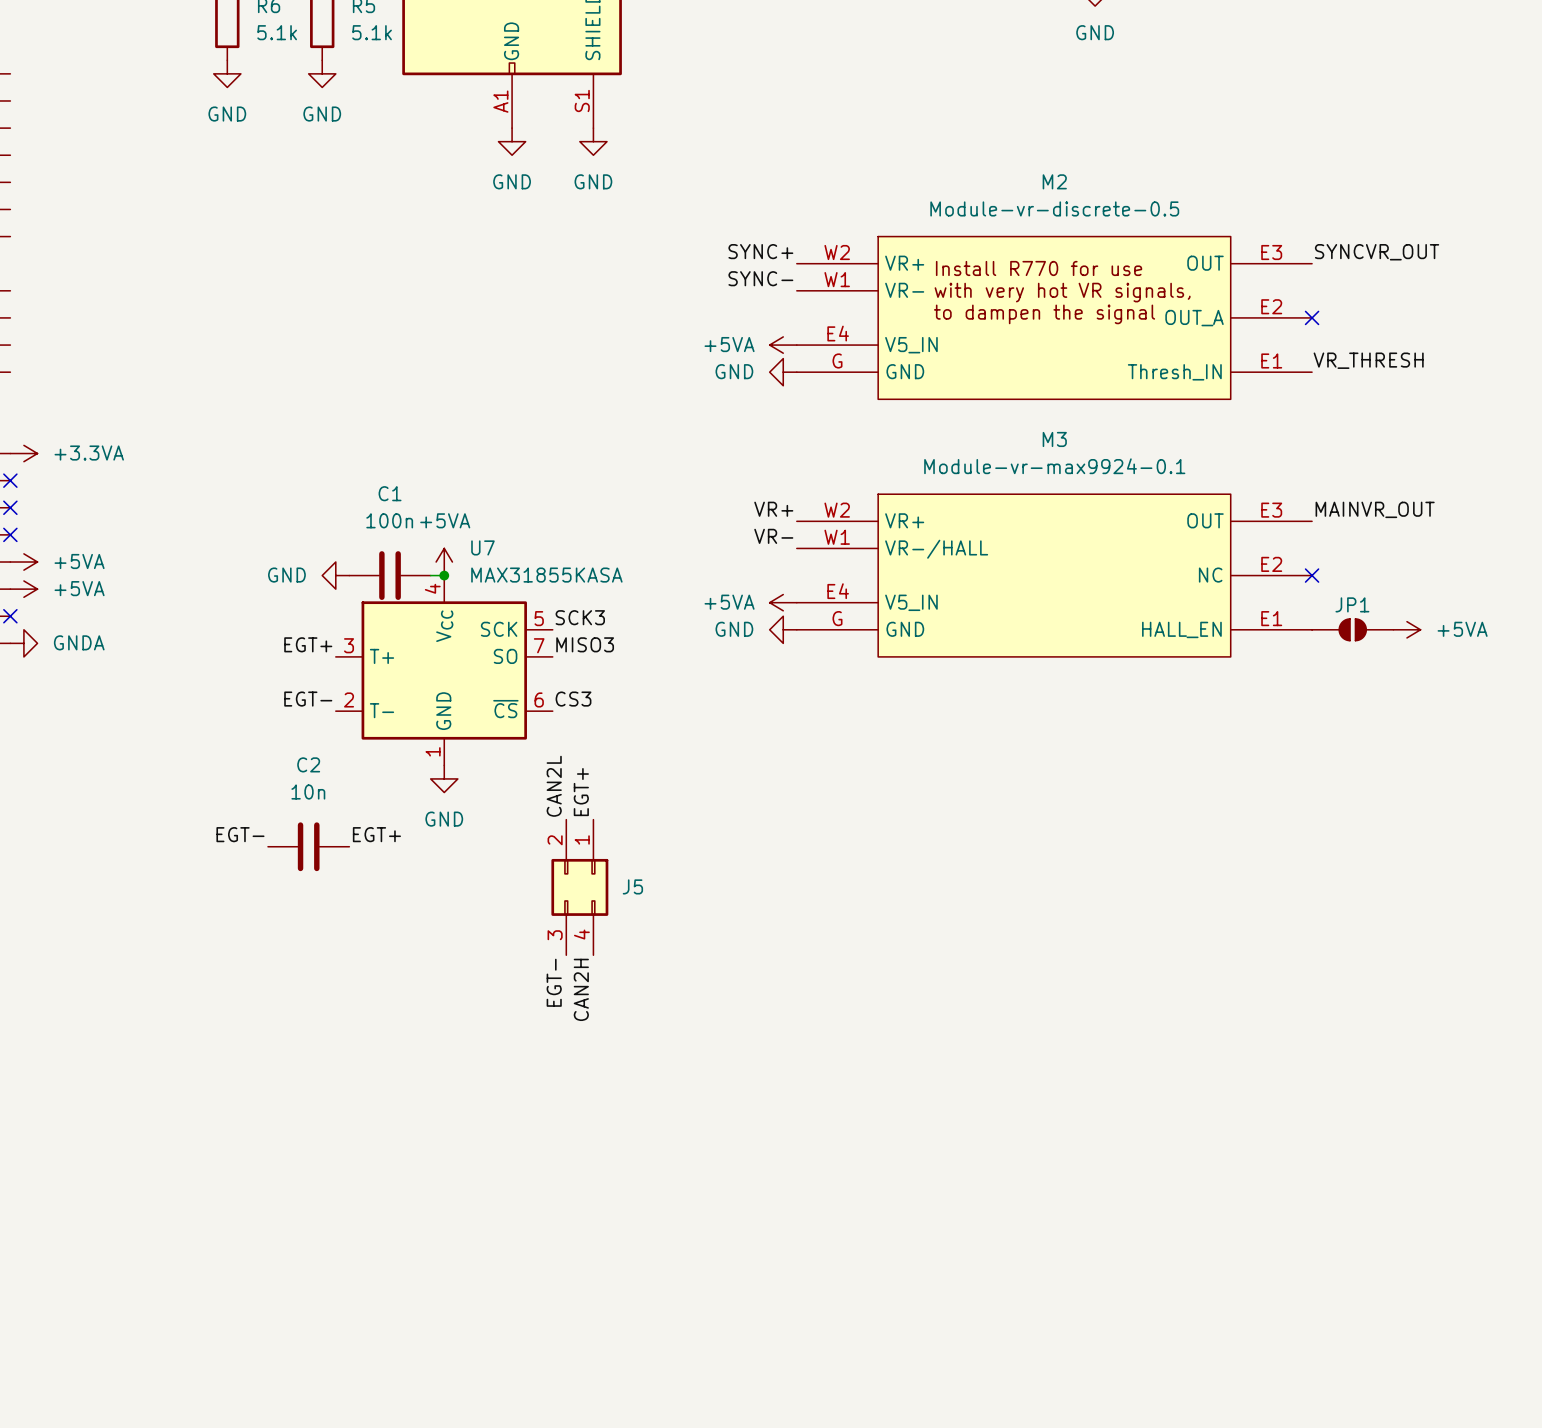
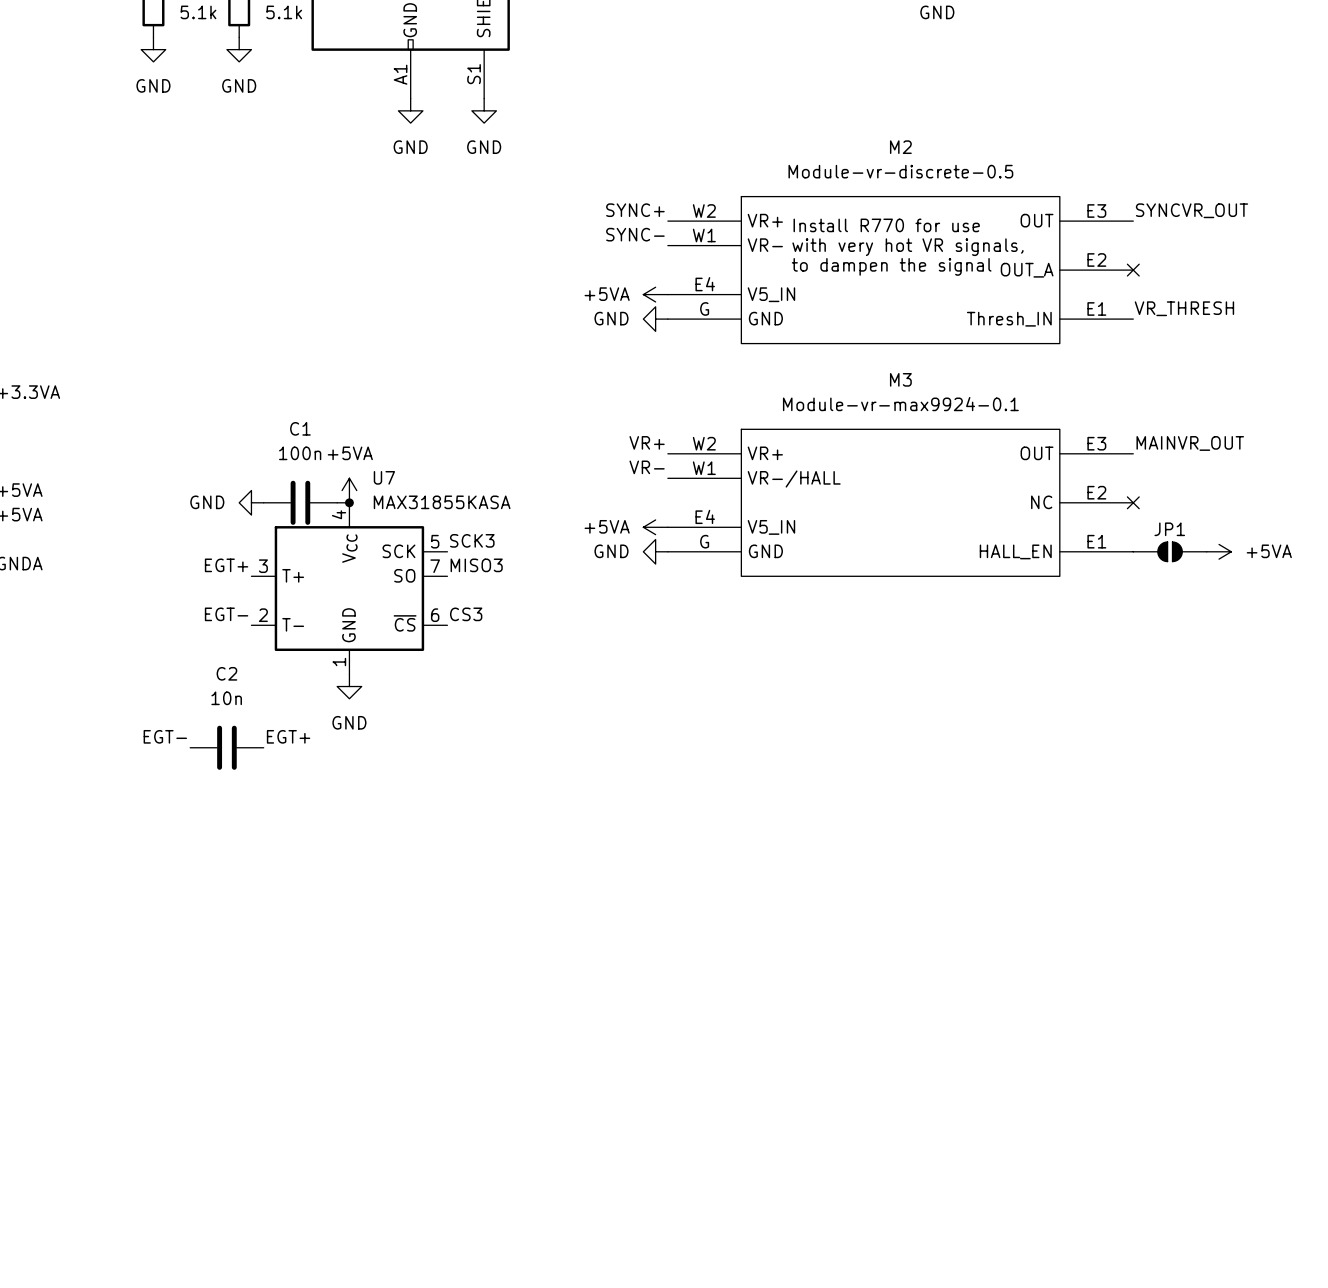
label: CAN2L (554, 786) -> none
label: EGT+ (581, 792) -> none
J5: (579, 887) -> none
label: EGT- (554, 982) -> none
label: CAN2H (581, 989) -> none

